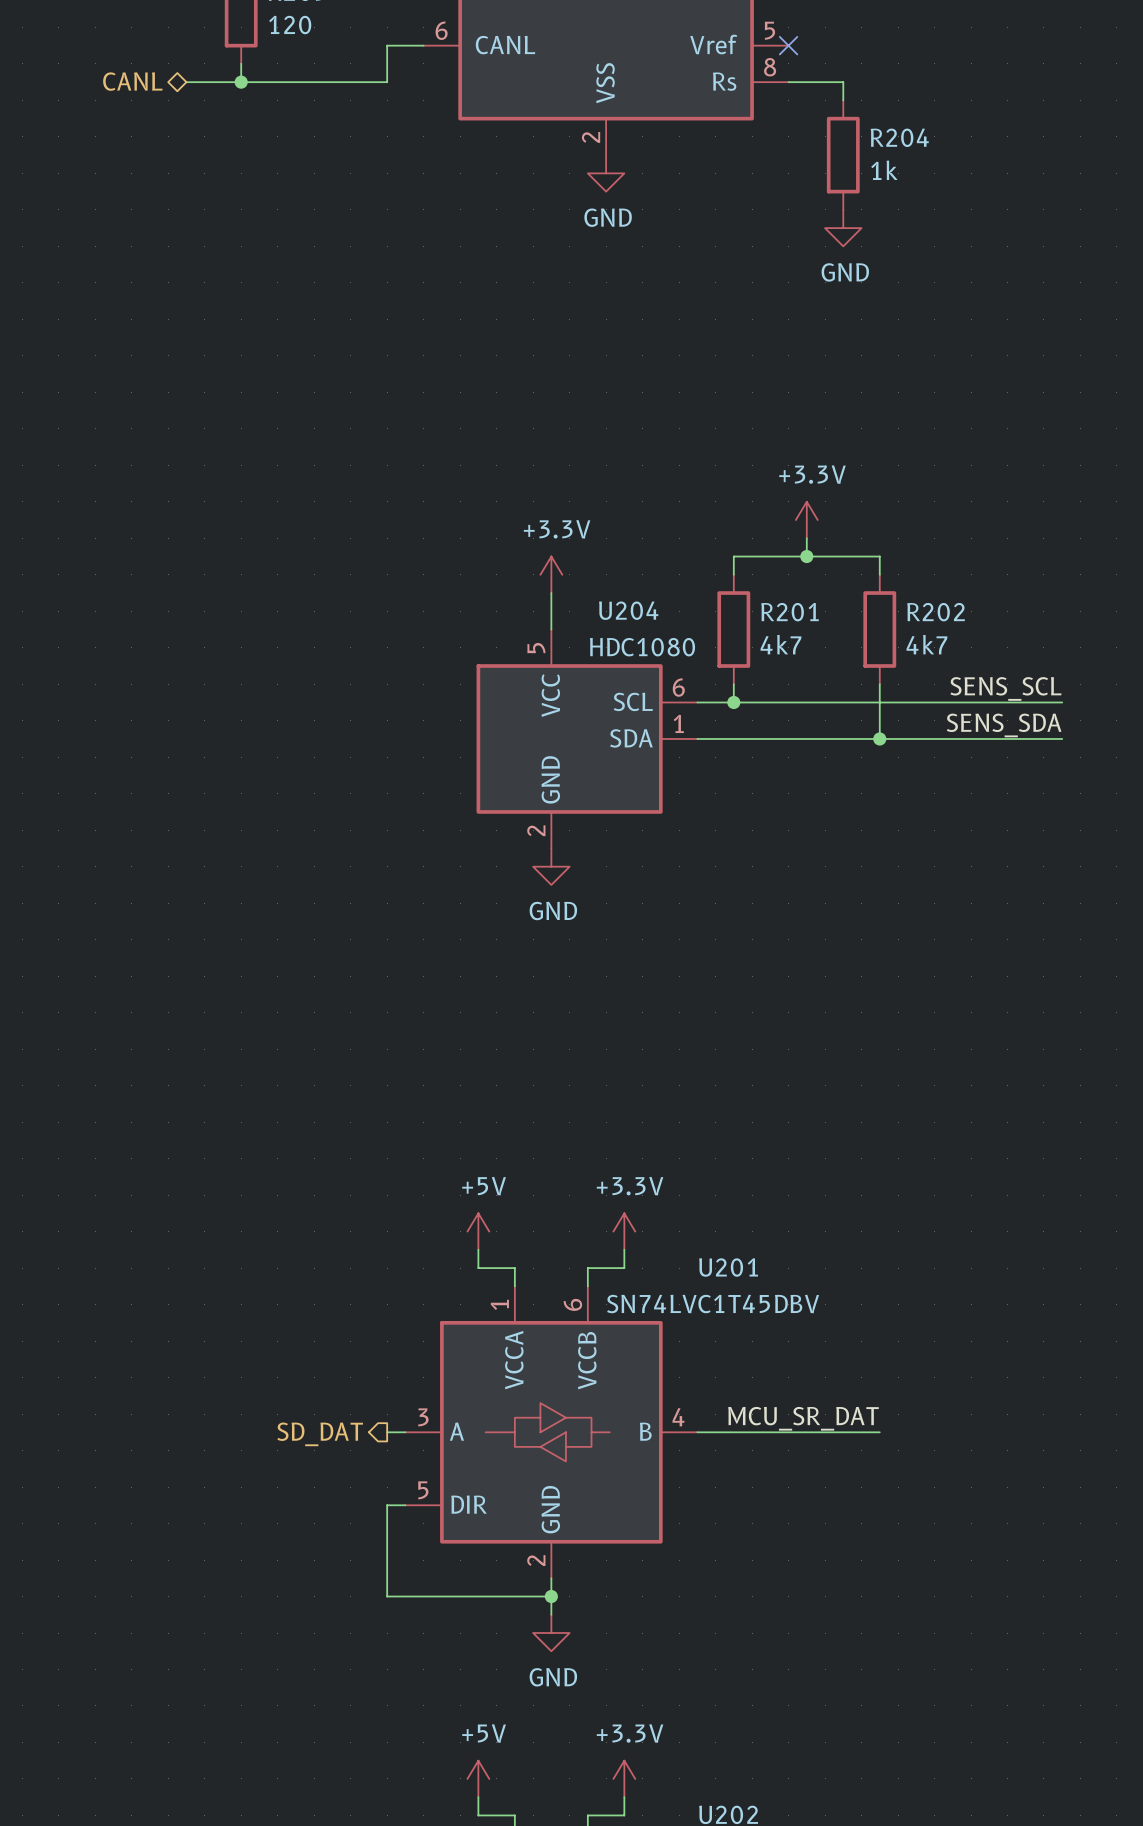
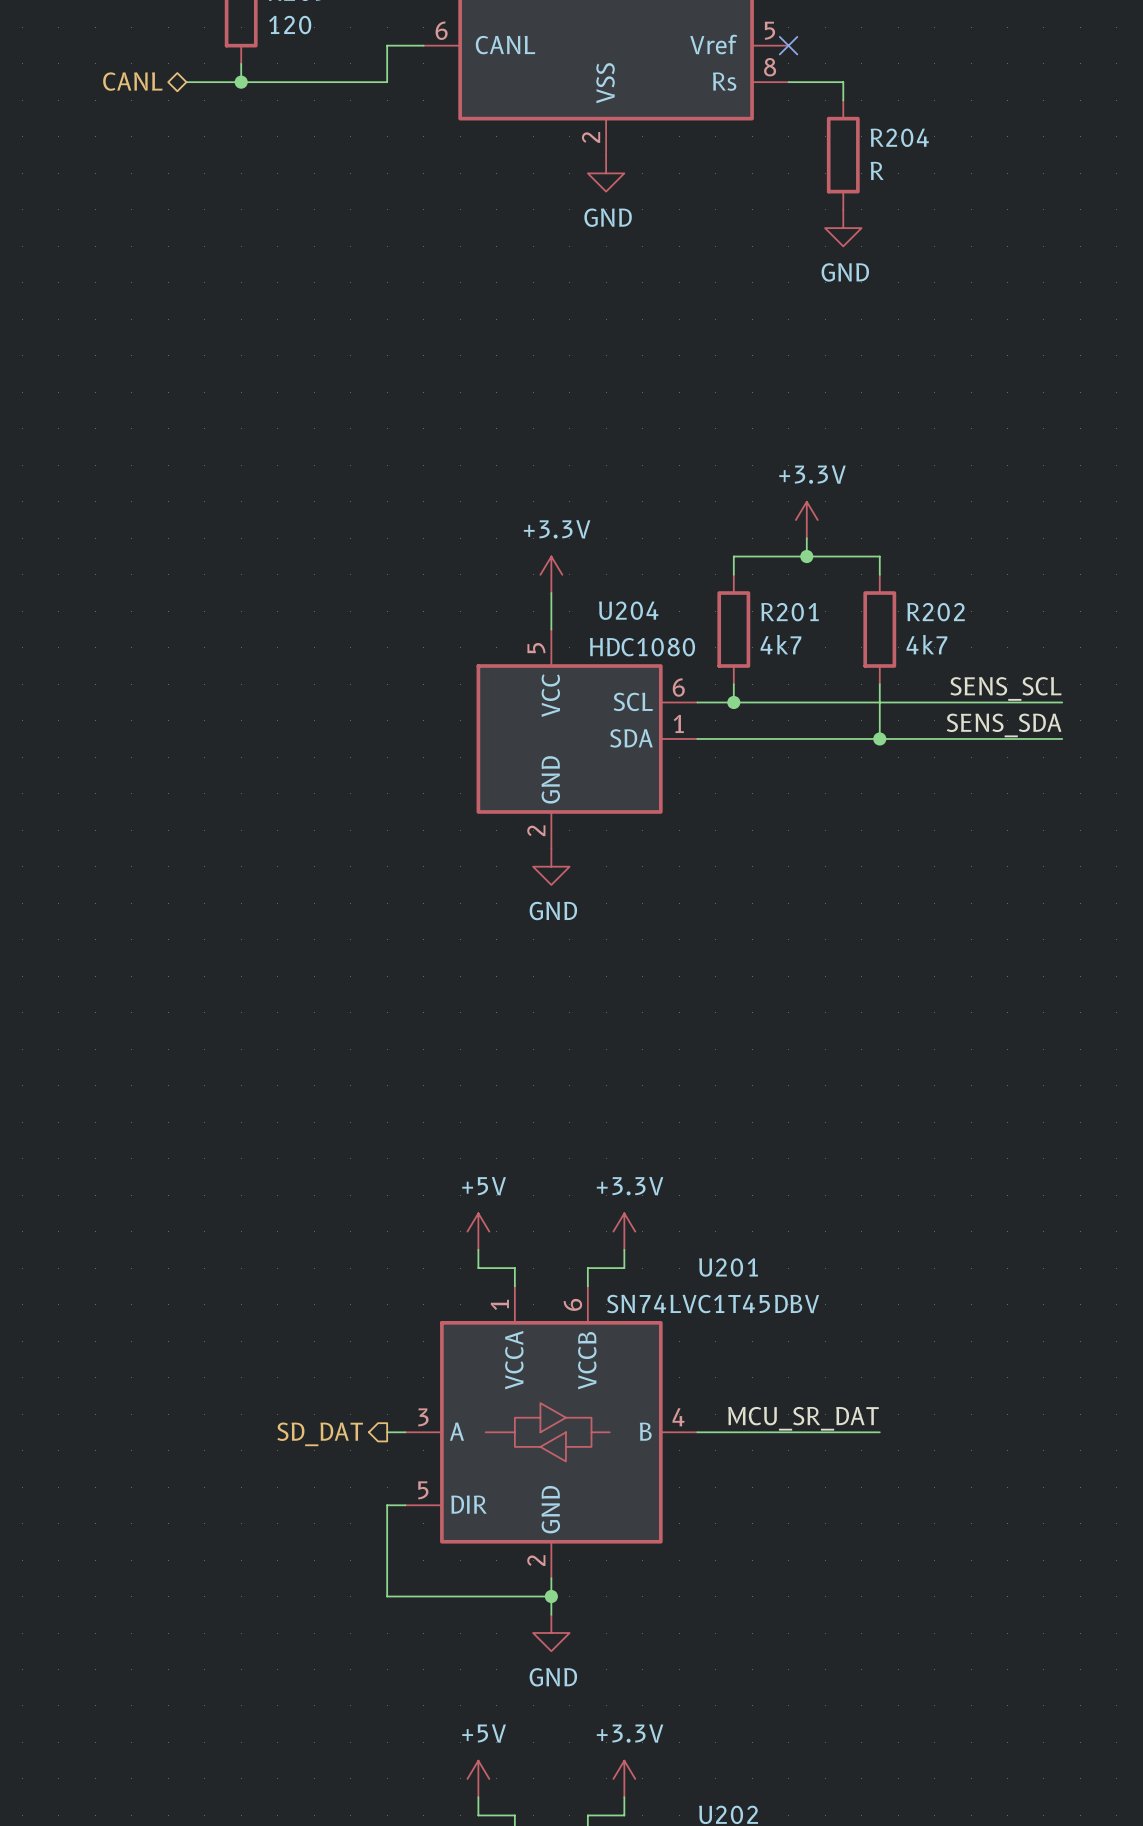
R204 value: 1k (884, 170) -> R (877, 170)

